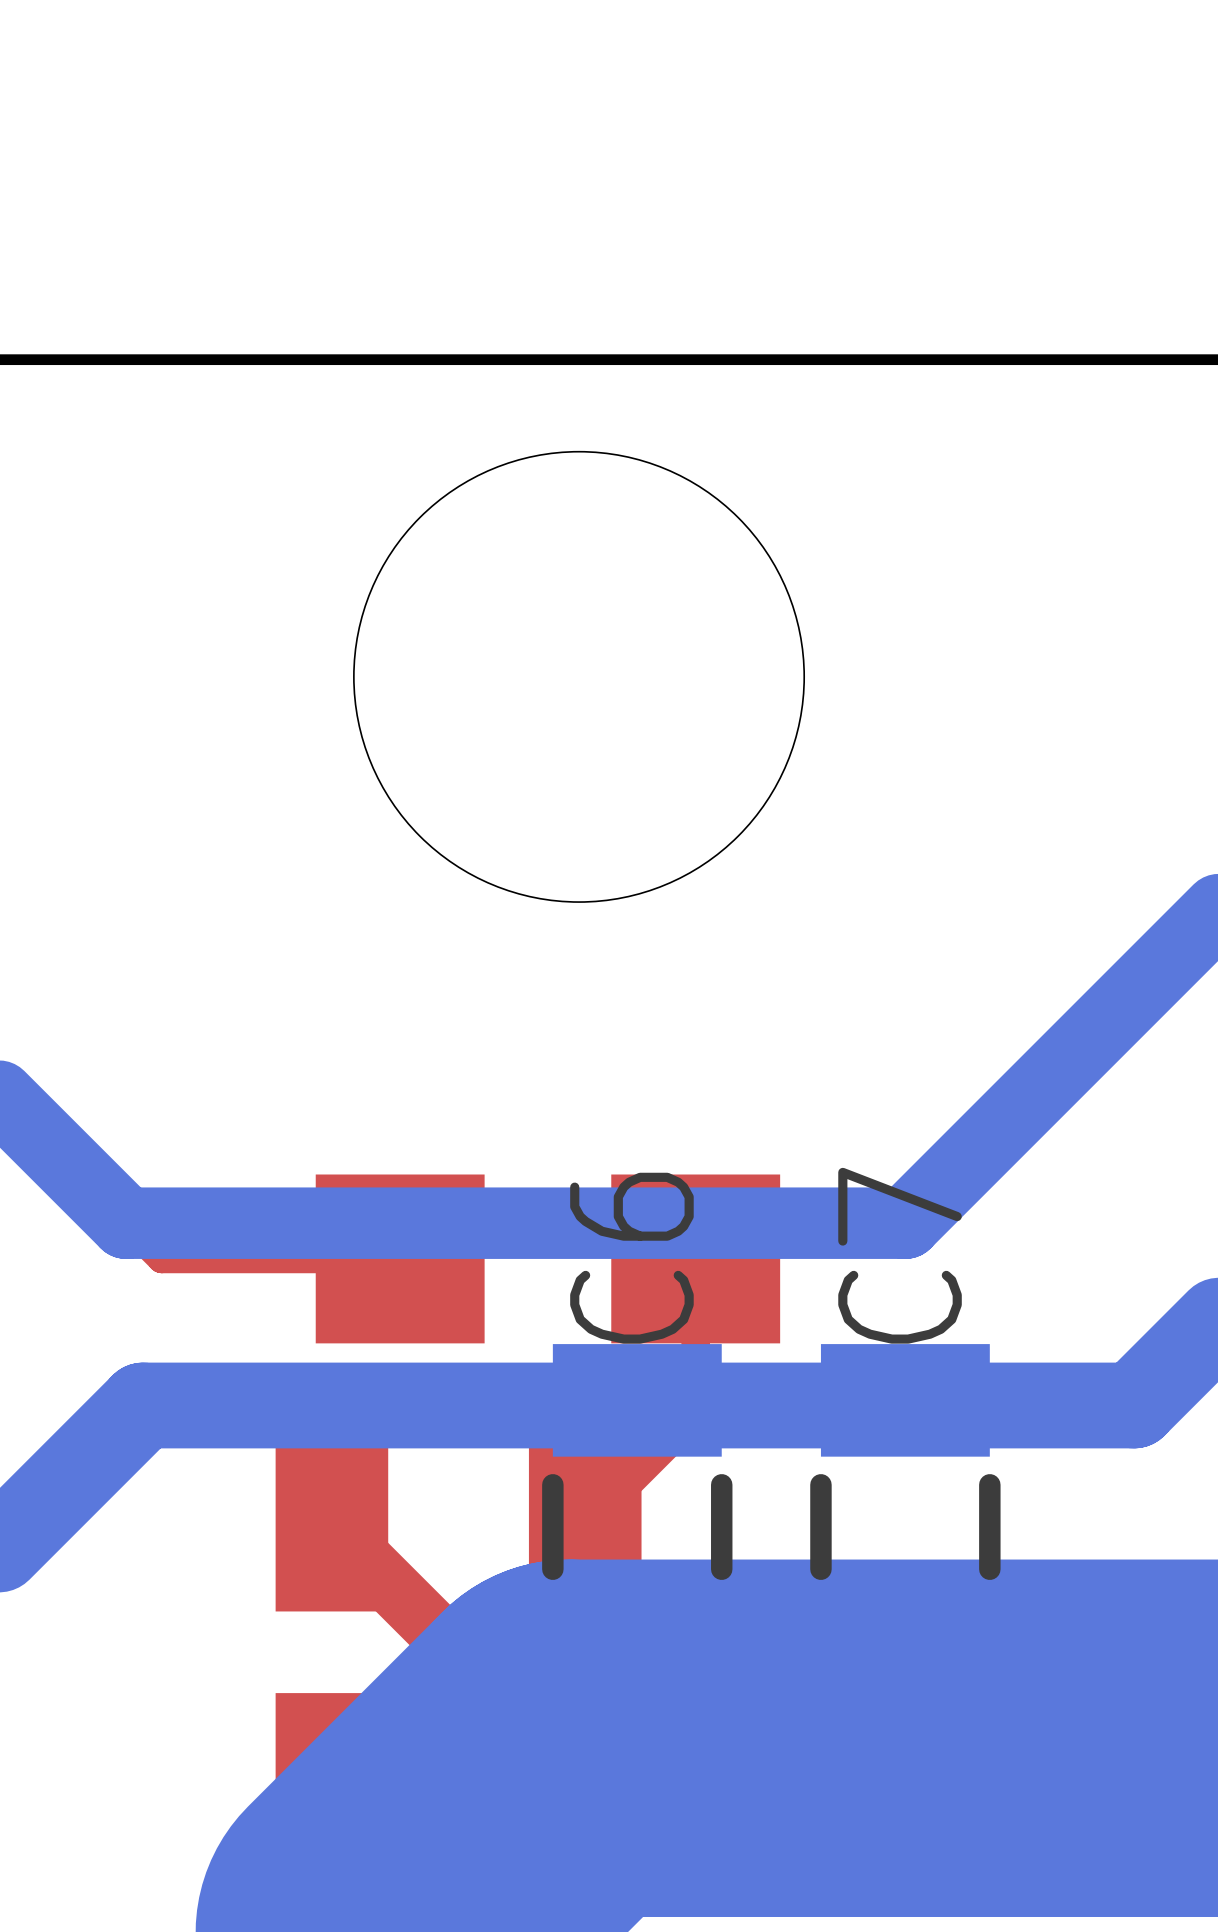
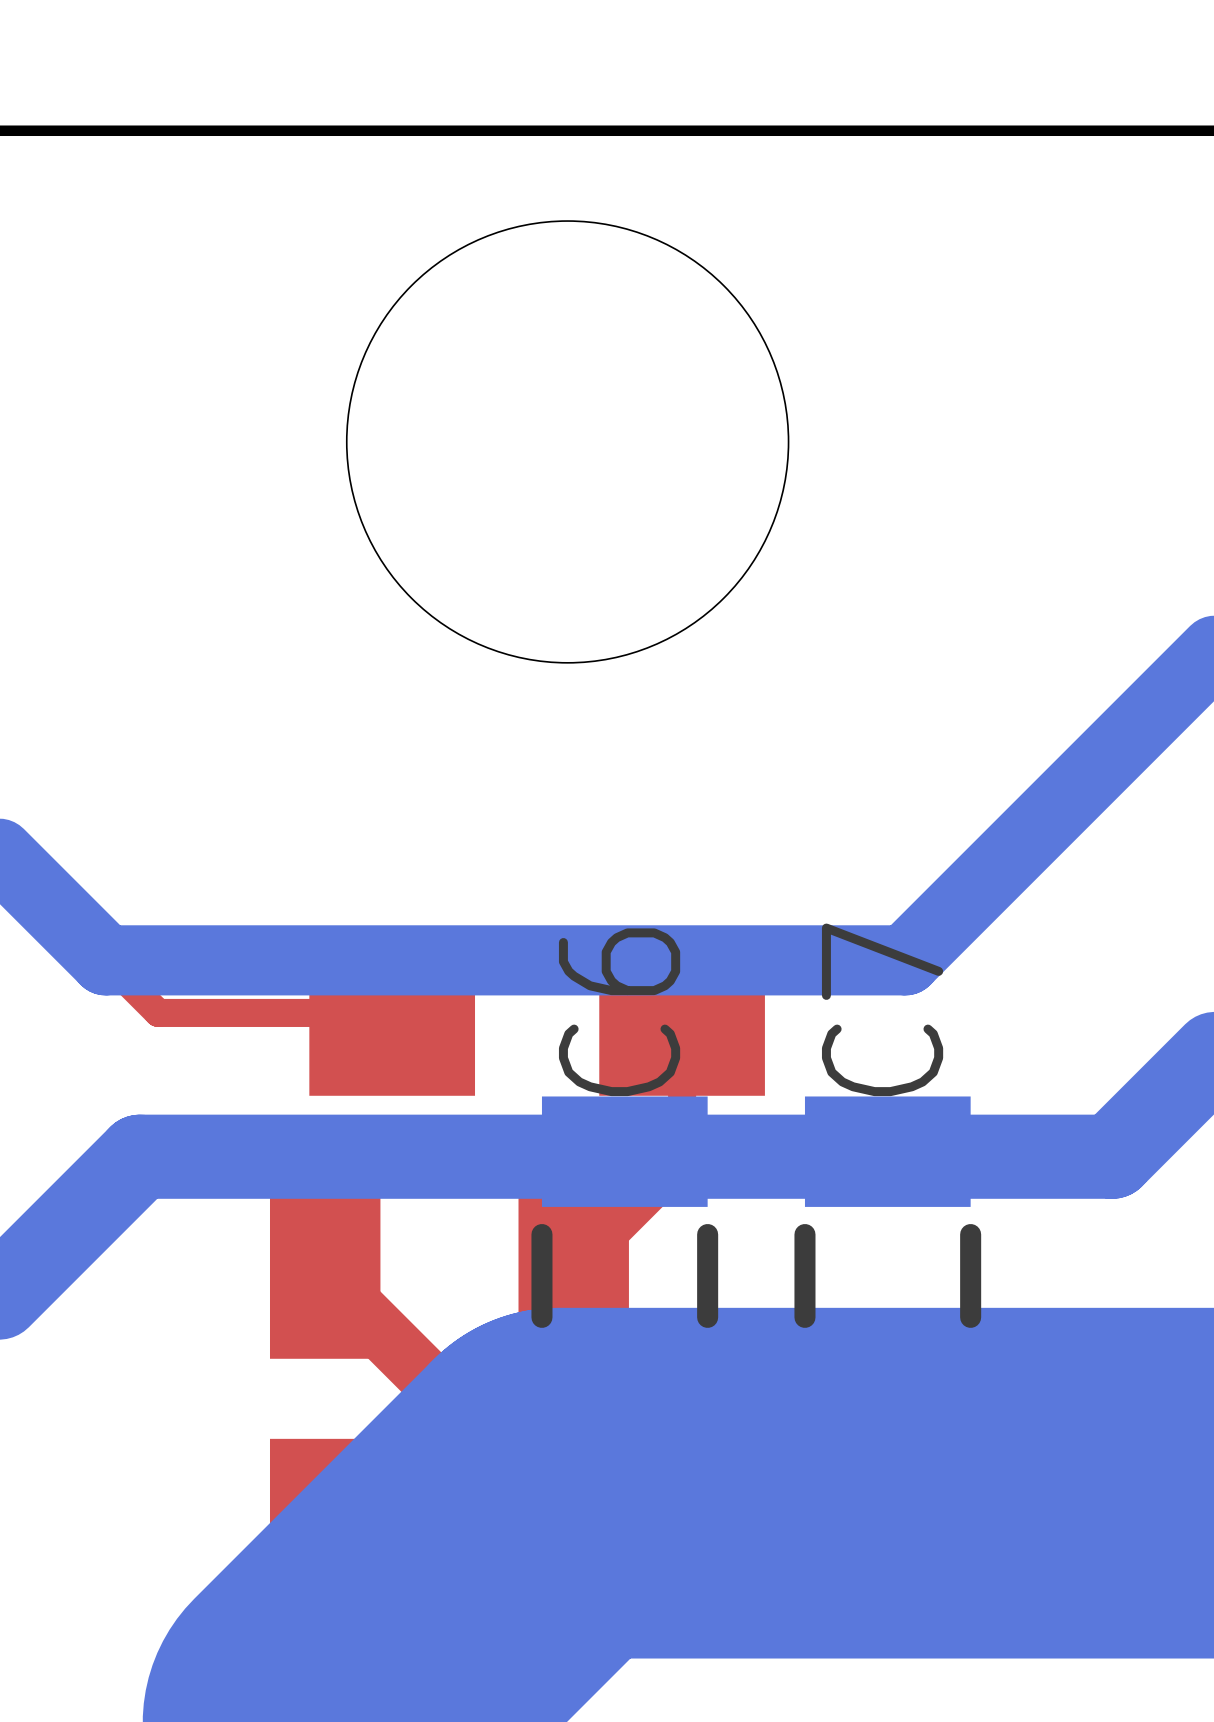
bottom track: (923, 1205) (905, 1223) (126, 1223) (108, 1205) -> (905, 960) (105, 960)

